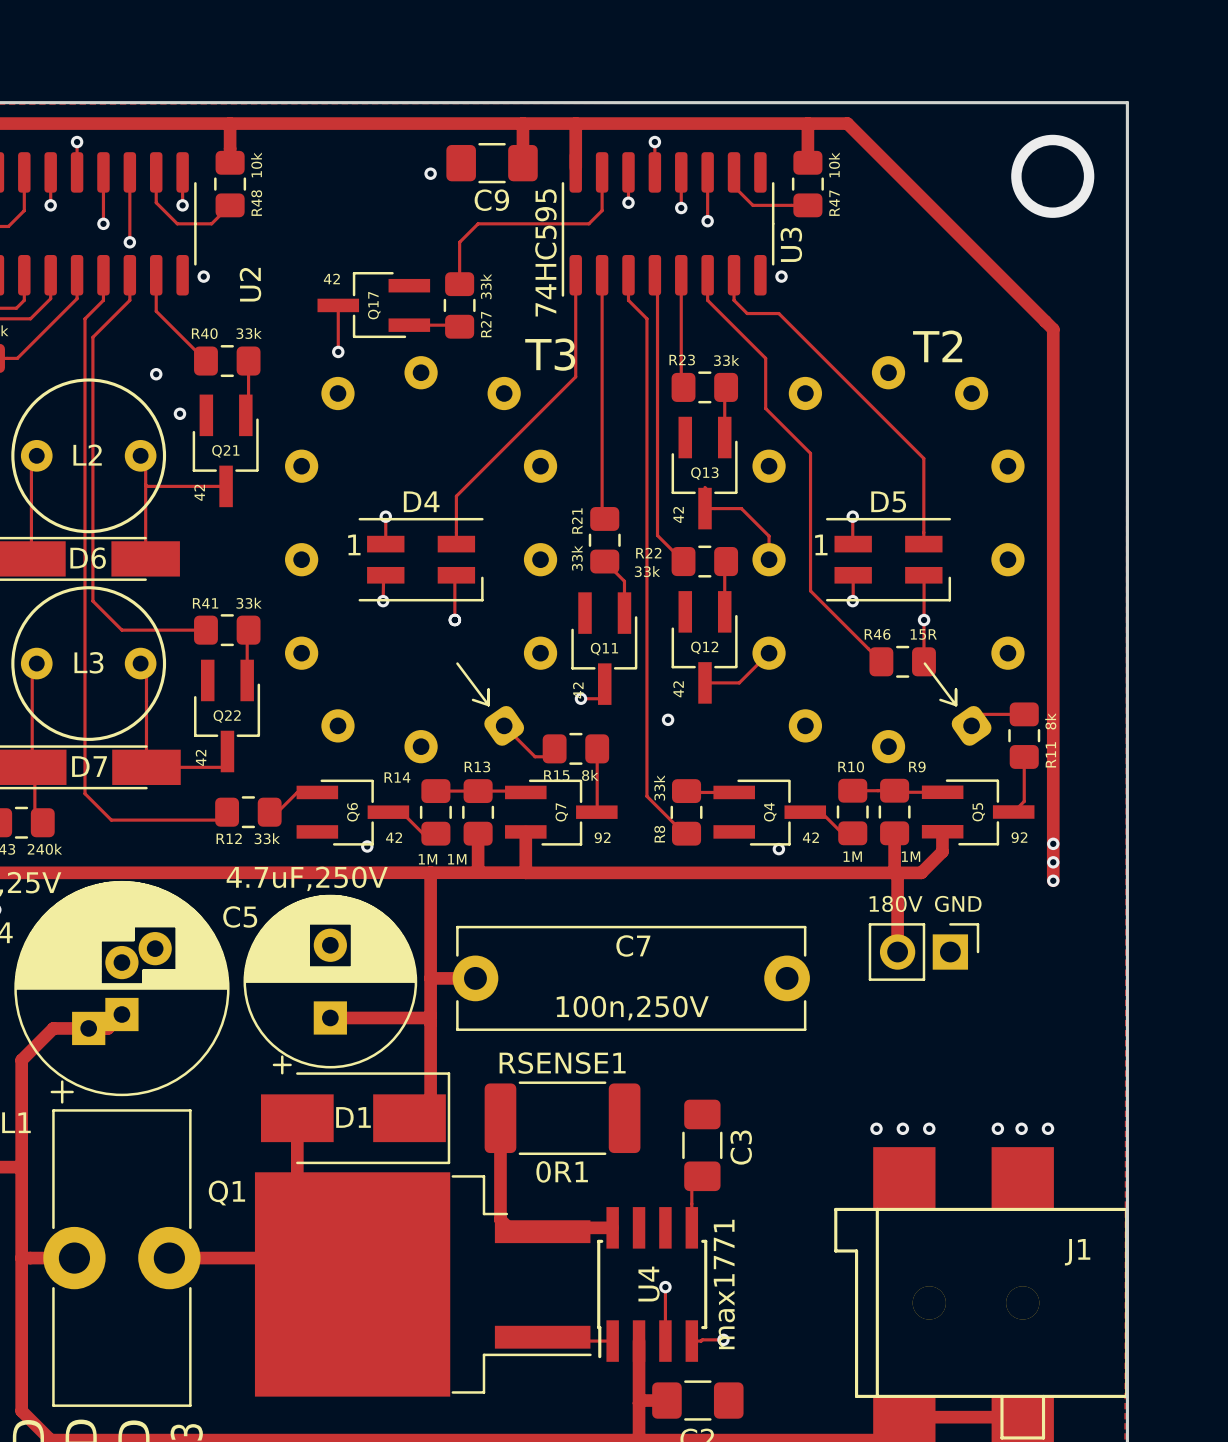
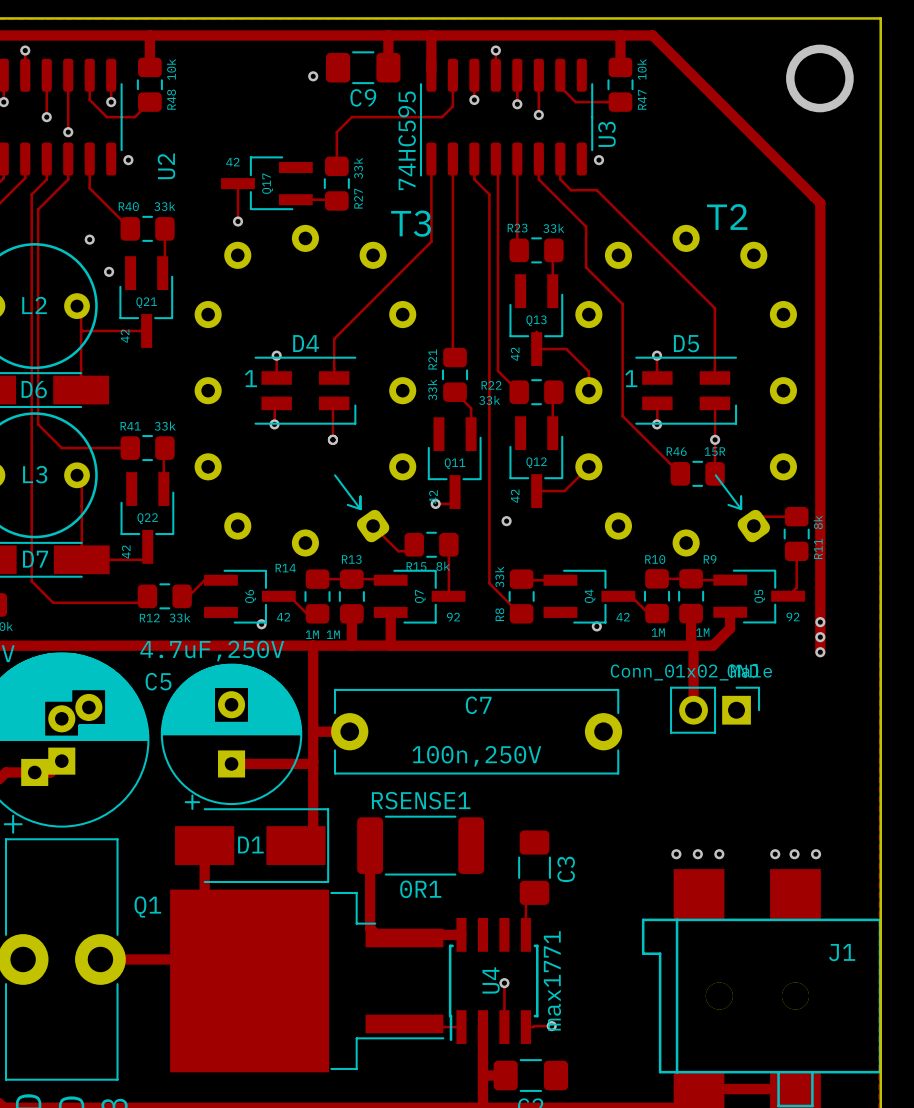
part value: 180V (896, 903) -> Conn_01x02_Male (691, 672)

